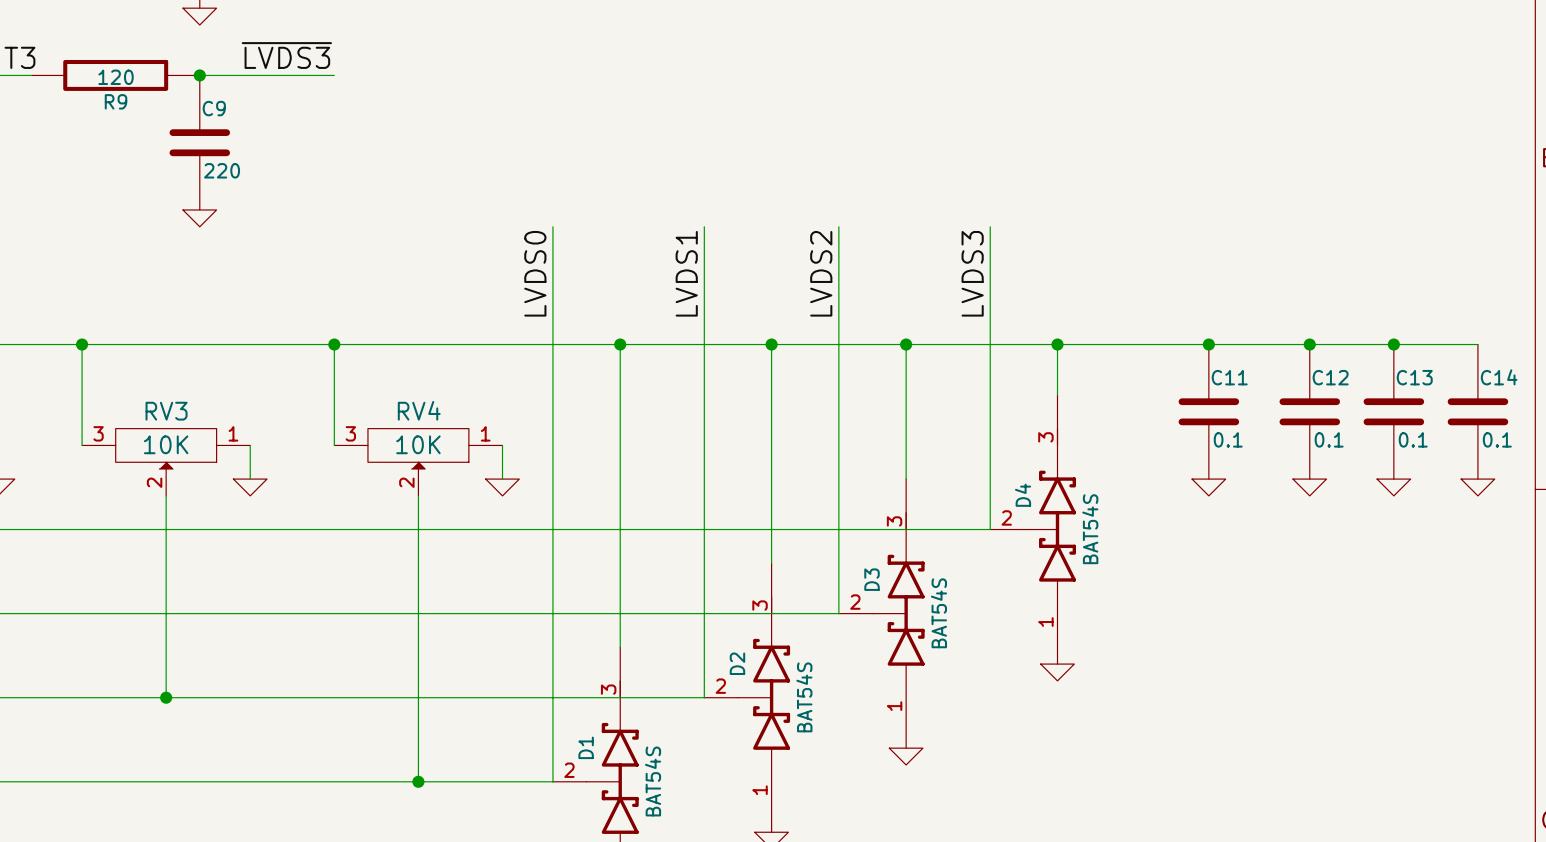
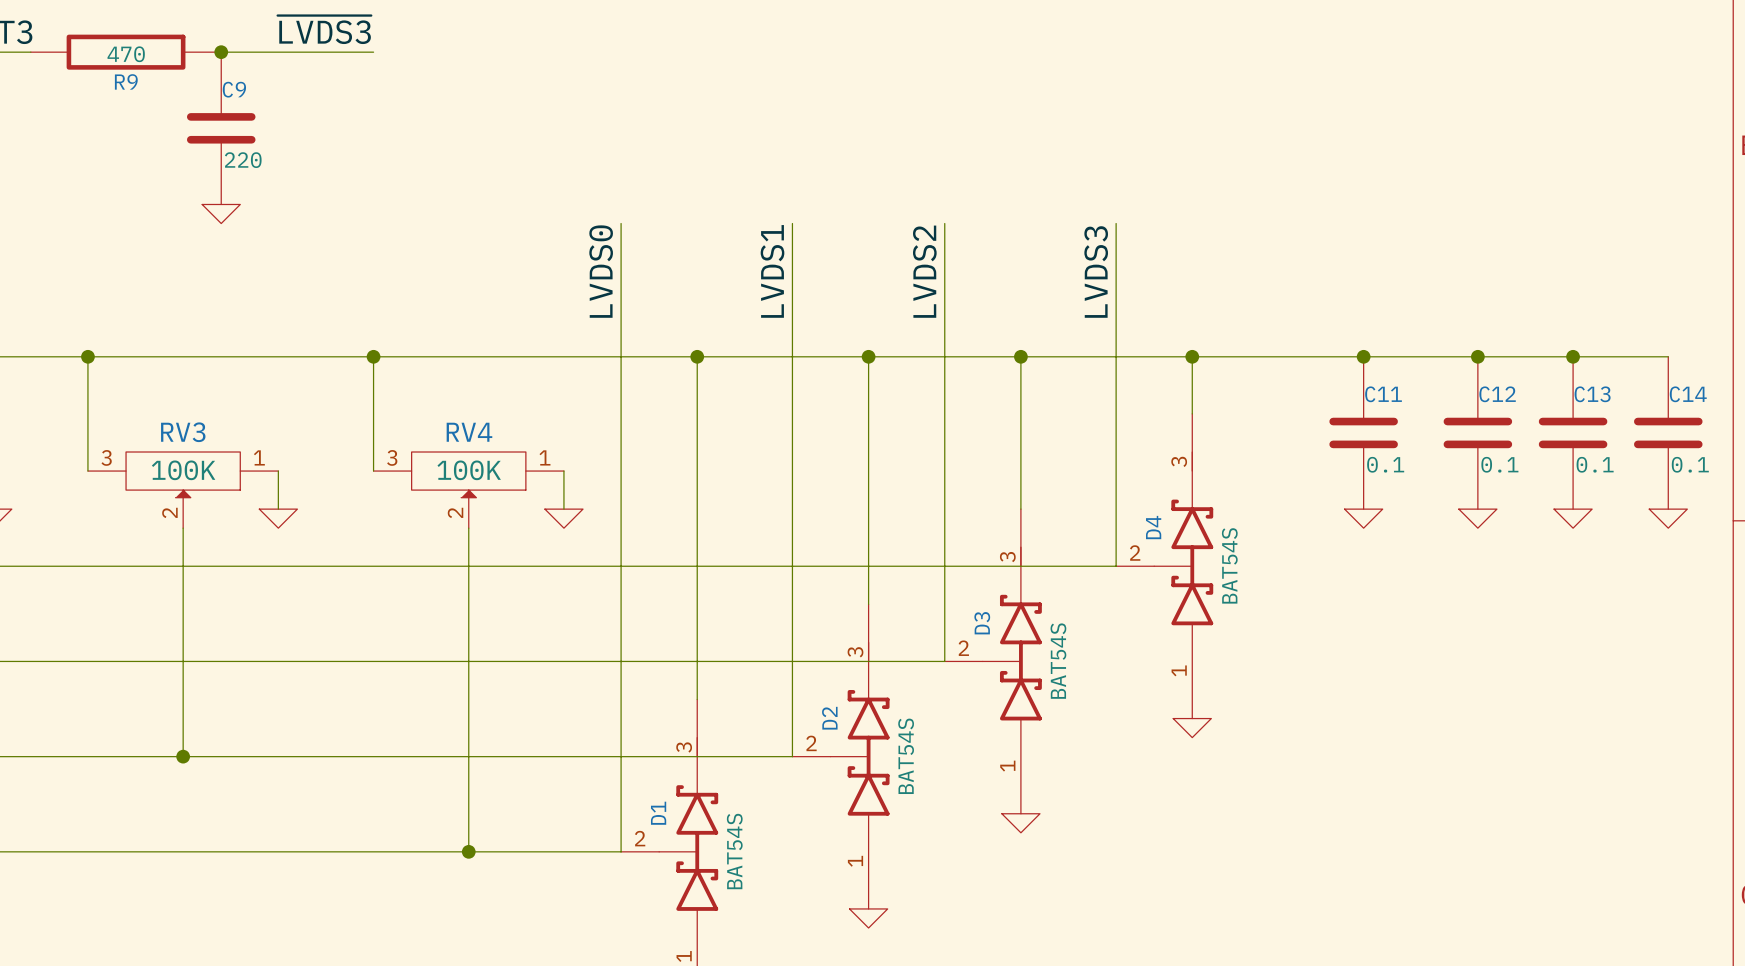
R9 value: 120 (116, 77) -> 470 (126, 54)
RV3 value: 10K (166, 444) -> 100K (183, 470)
RV4 value: 10K (418, 444) -> 100K (469, 470)

